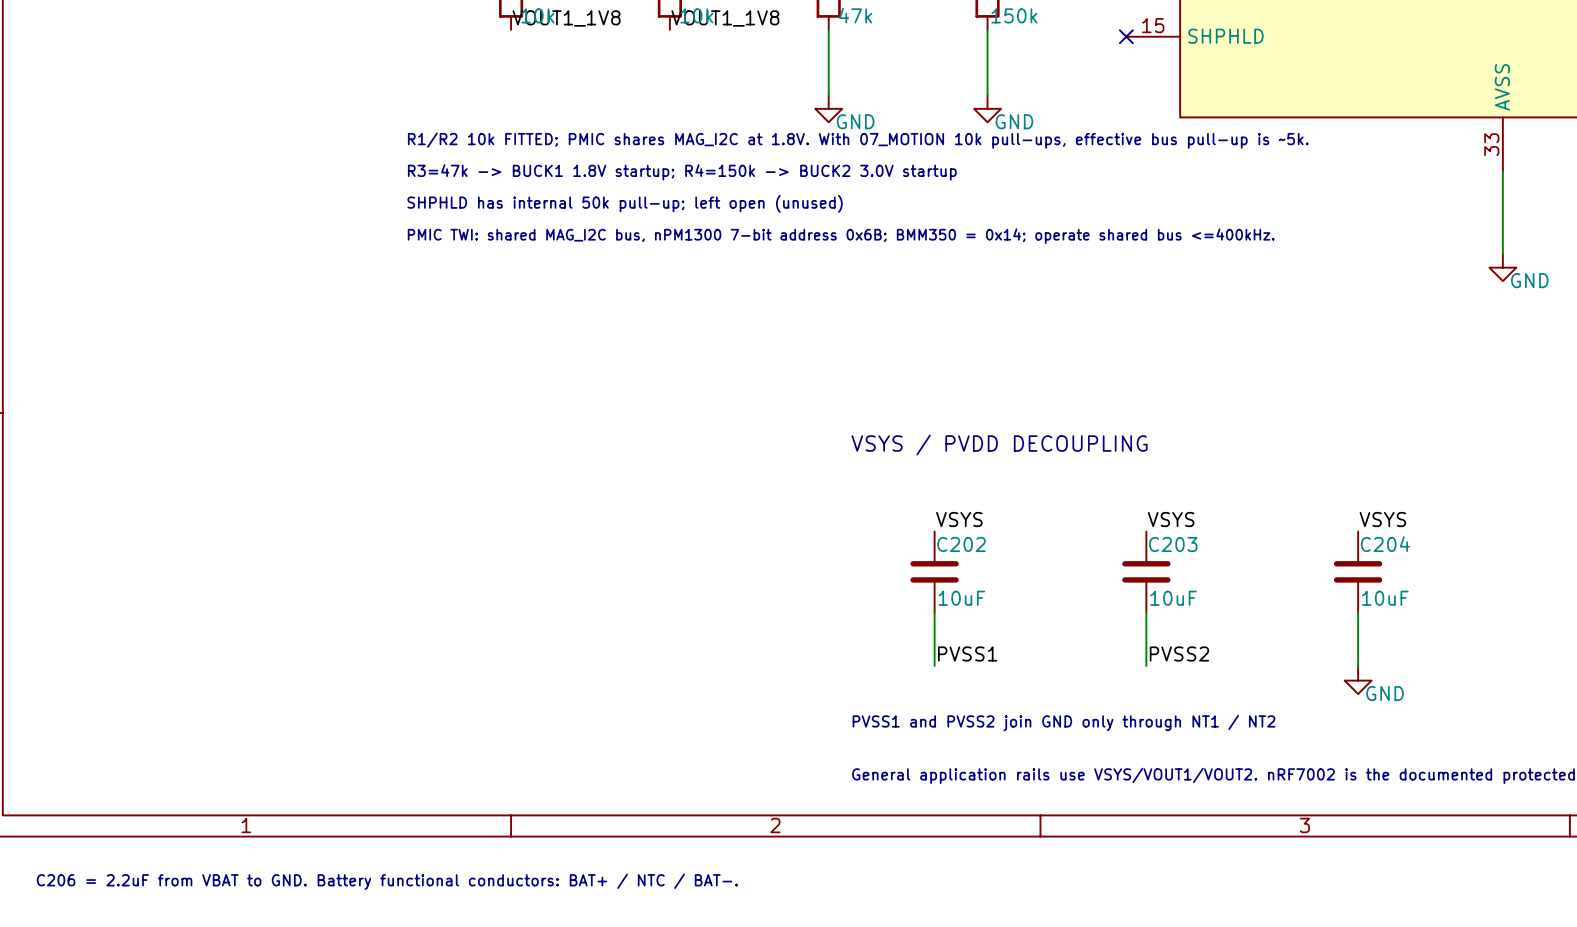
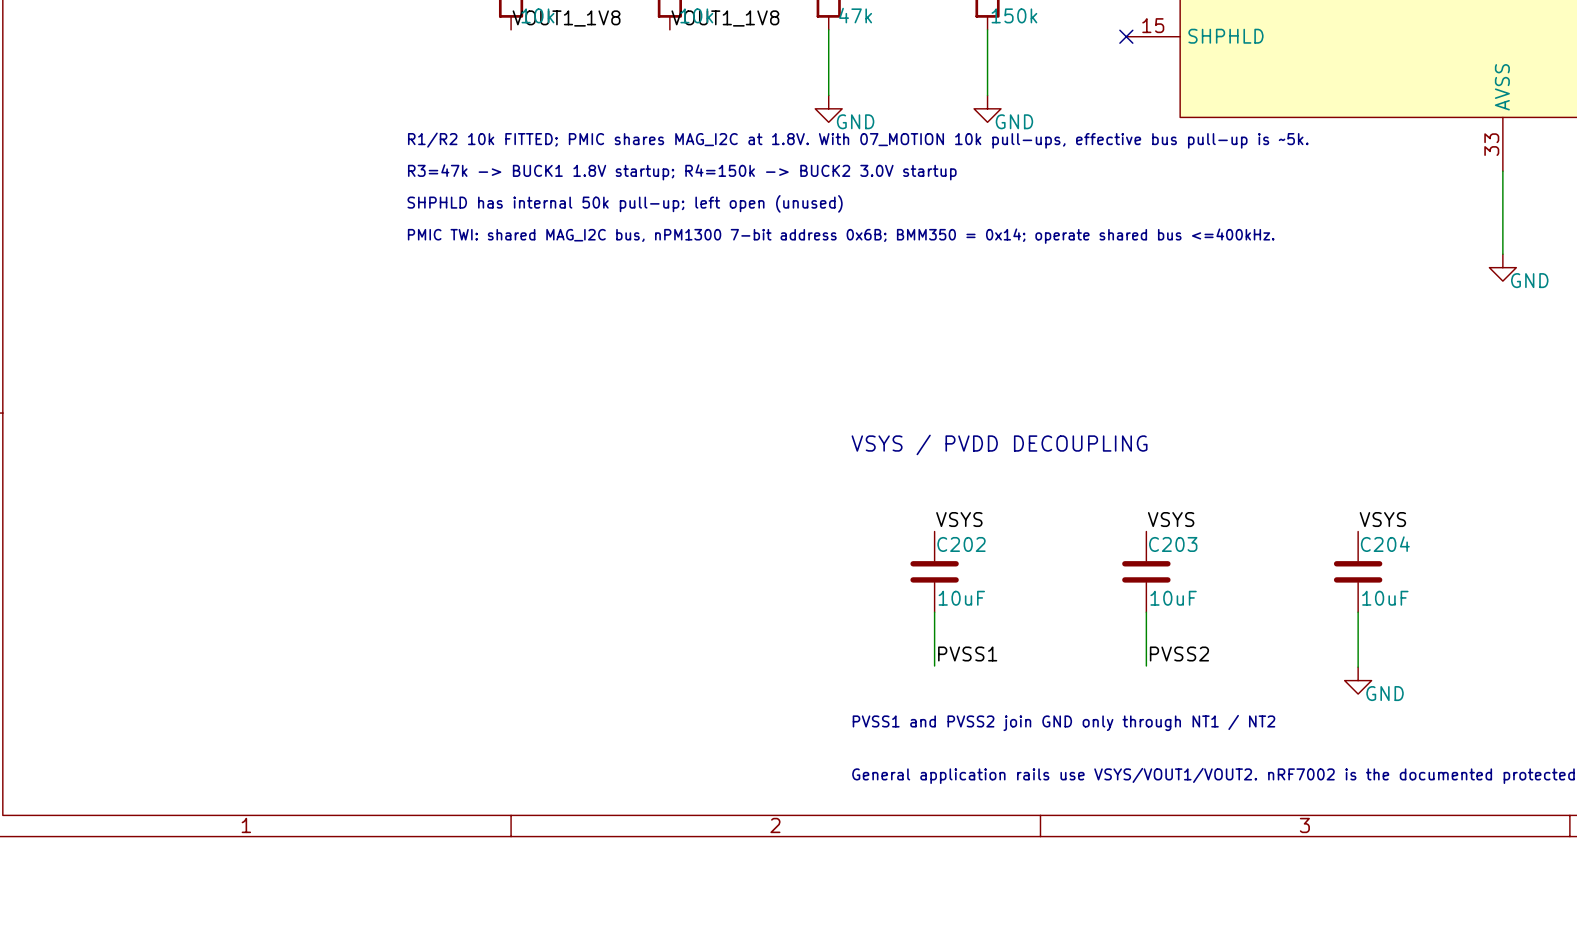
text: C206 = 2.2uF from VBAT to GND. Battery functional conductors: BAT+ / NTC / BAT-. (387, 881) -> none

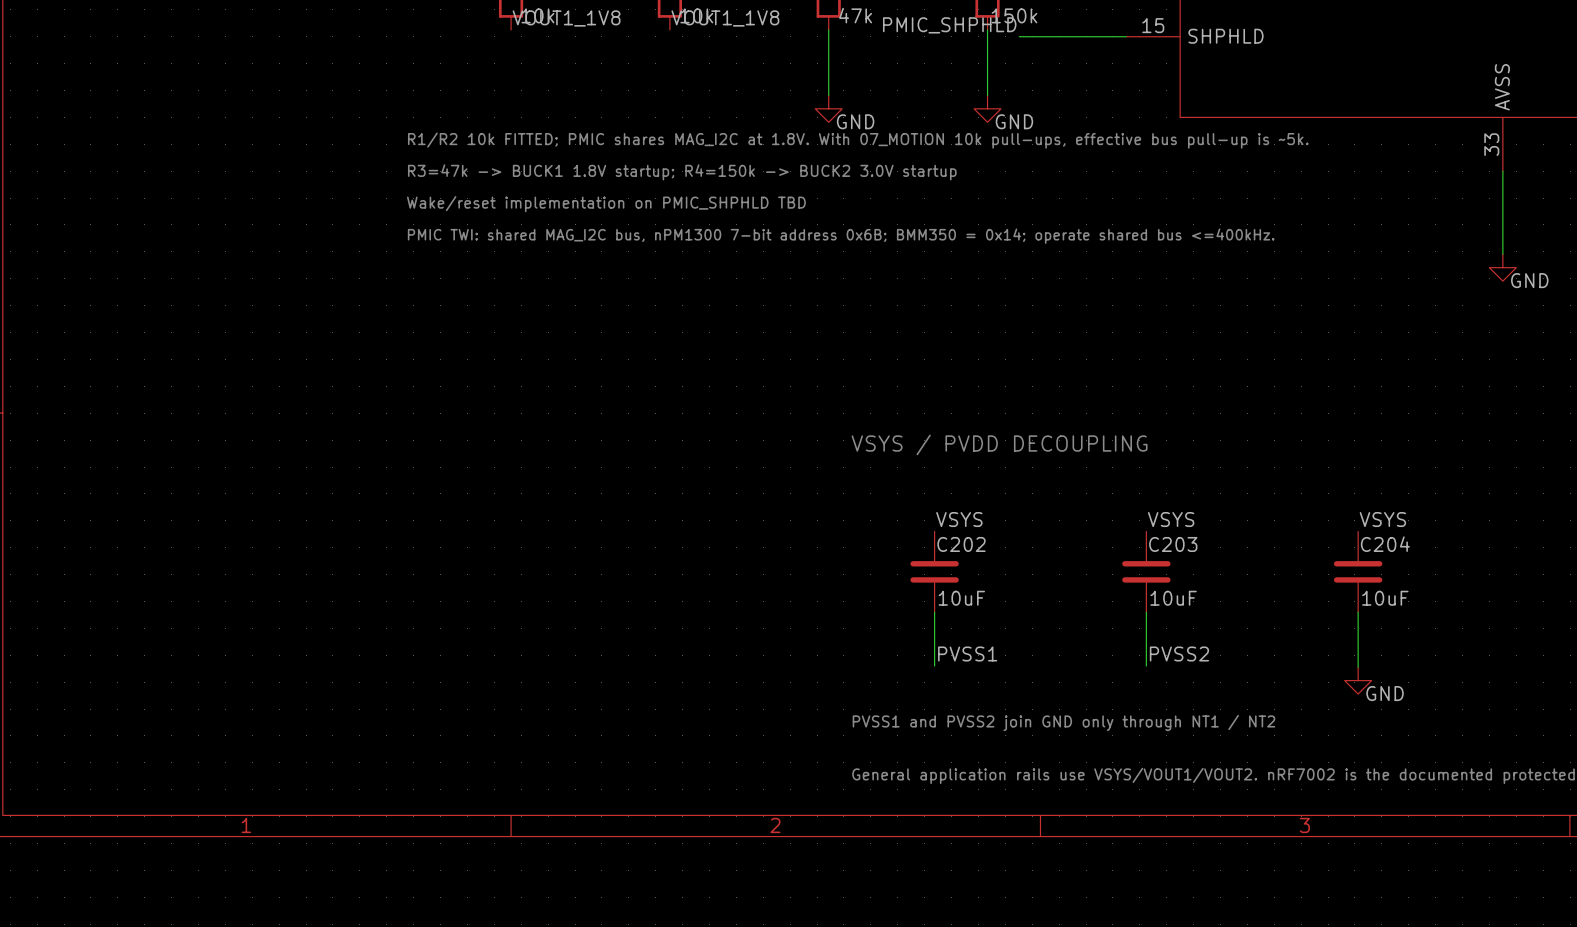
label: none -> PMIC_SHPHLD (949, 25)
wire: none -> (1019, 36) (1126, 36)
no-connect mark: (1126, 36) -> none
text: SHPHLD has internal 50k pull-up; left open (unused) (625, 203) -> Wake/reset implementation on PMIC_SHPHLD TBD (606, 204)

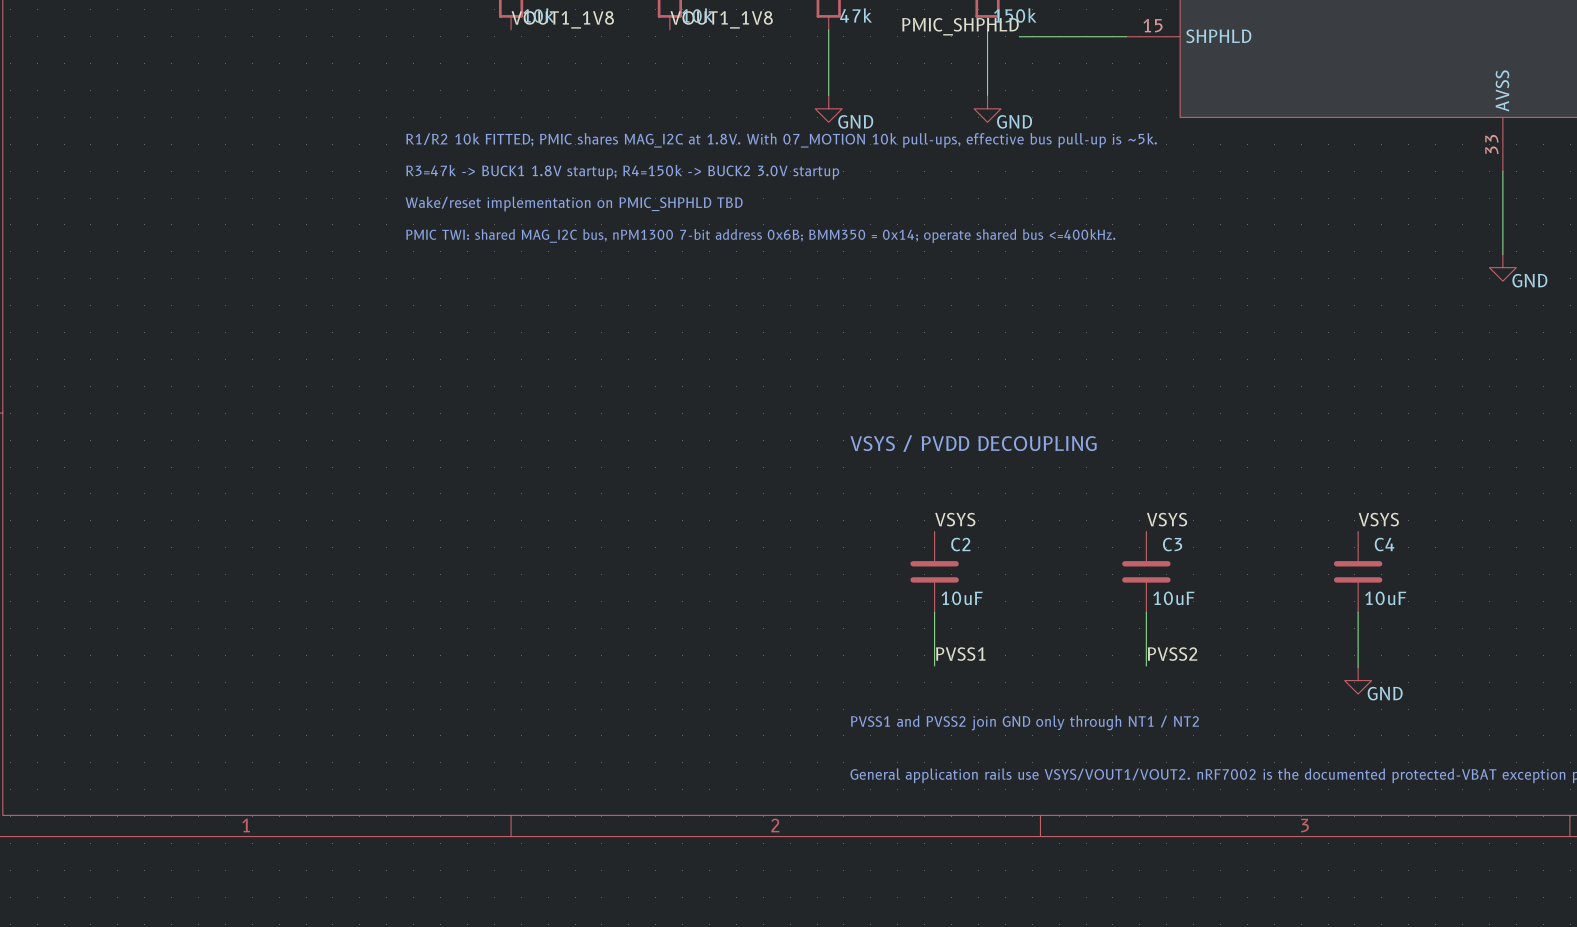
C202 name: C202 (961, 544) -> C2 (960, 544)
C203 name: C203 (1173, 544) -> C3 (1172, 544)
C204 name: C204 (1385, 544) -> C4 (1384, 544)

